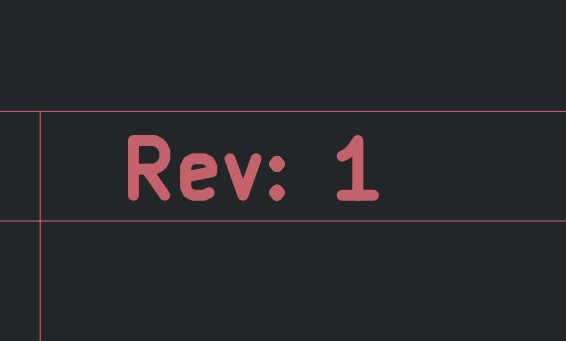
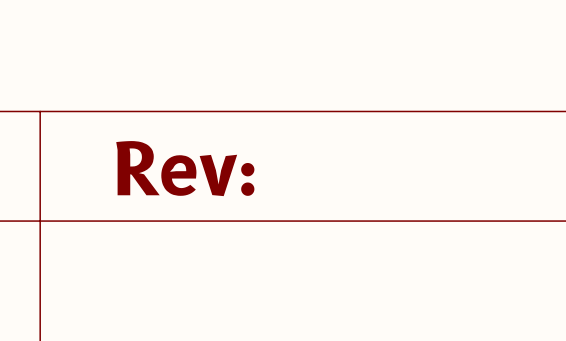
title block: Rev: 1 (253, 167) -> Rev: (185, 168)

